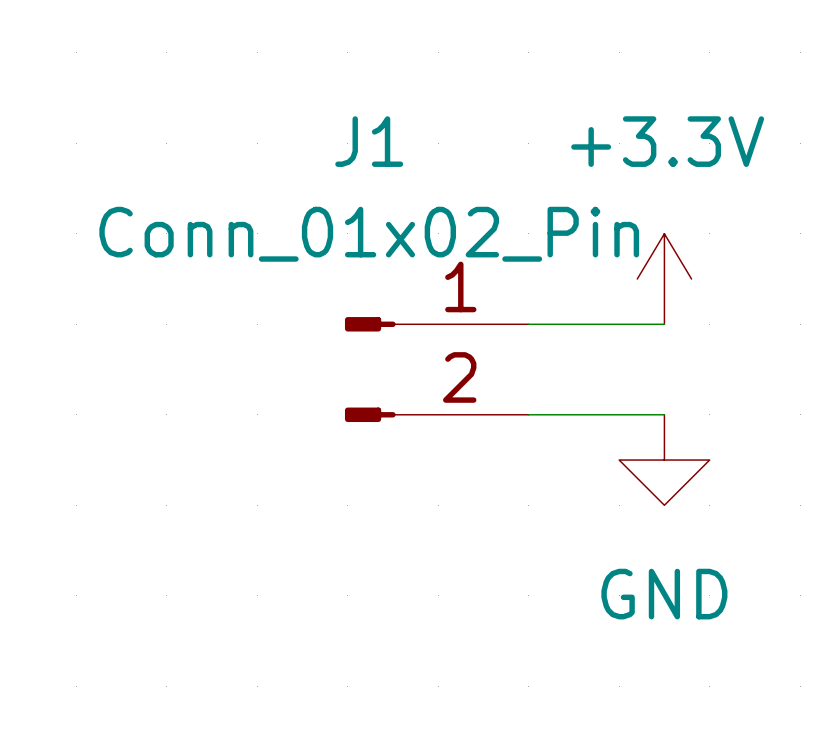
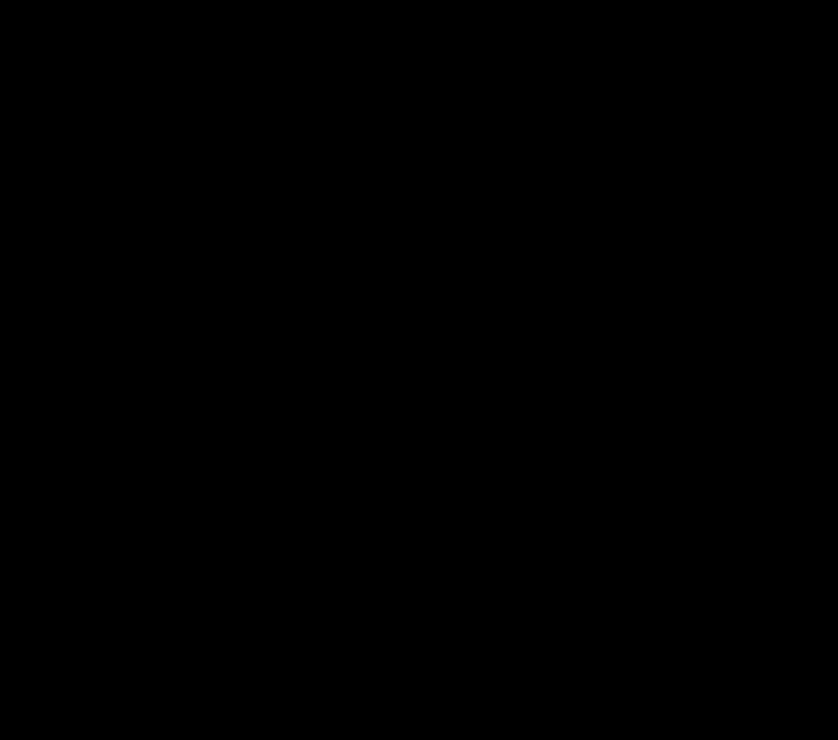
power symbol: +3.3V (664, 279) -> none
wire: (528, 324) (664, 324) -> none
J1: Conn_01x02_Pin (436, 369) -> none
wire: (528, 414) (664, 414) -> none
power symbol: GND (664, 460) -> none

